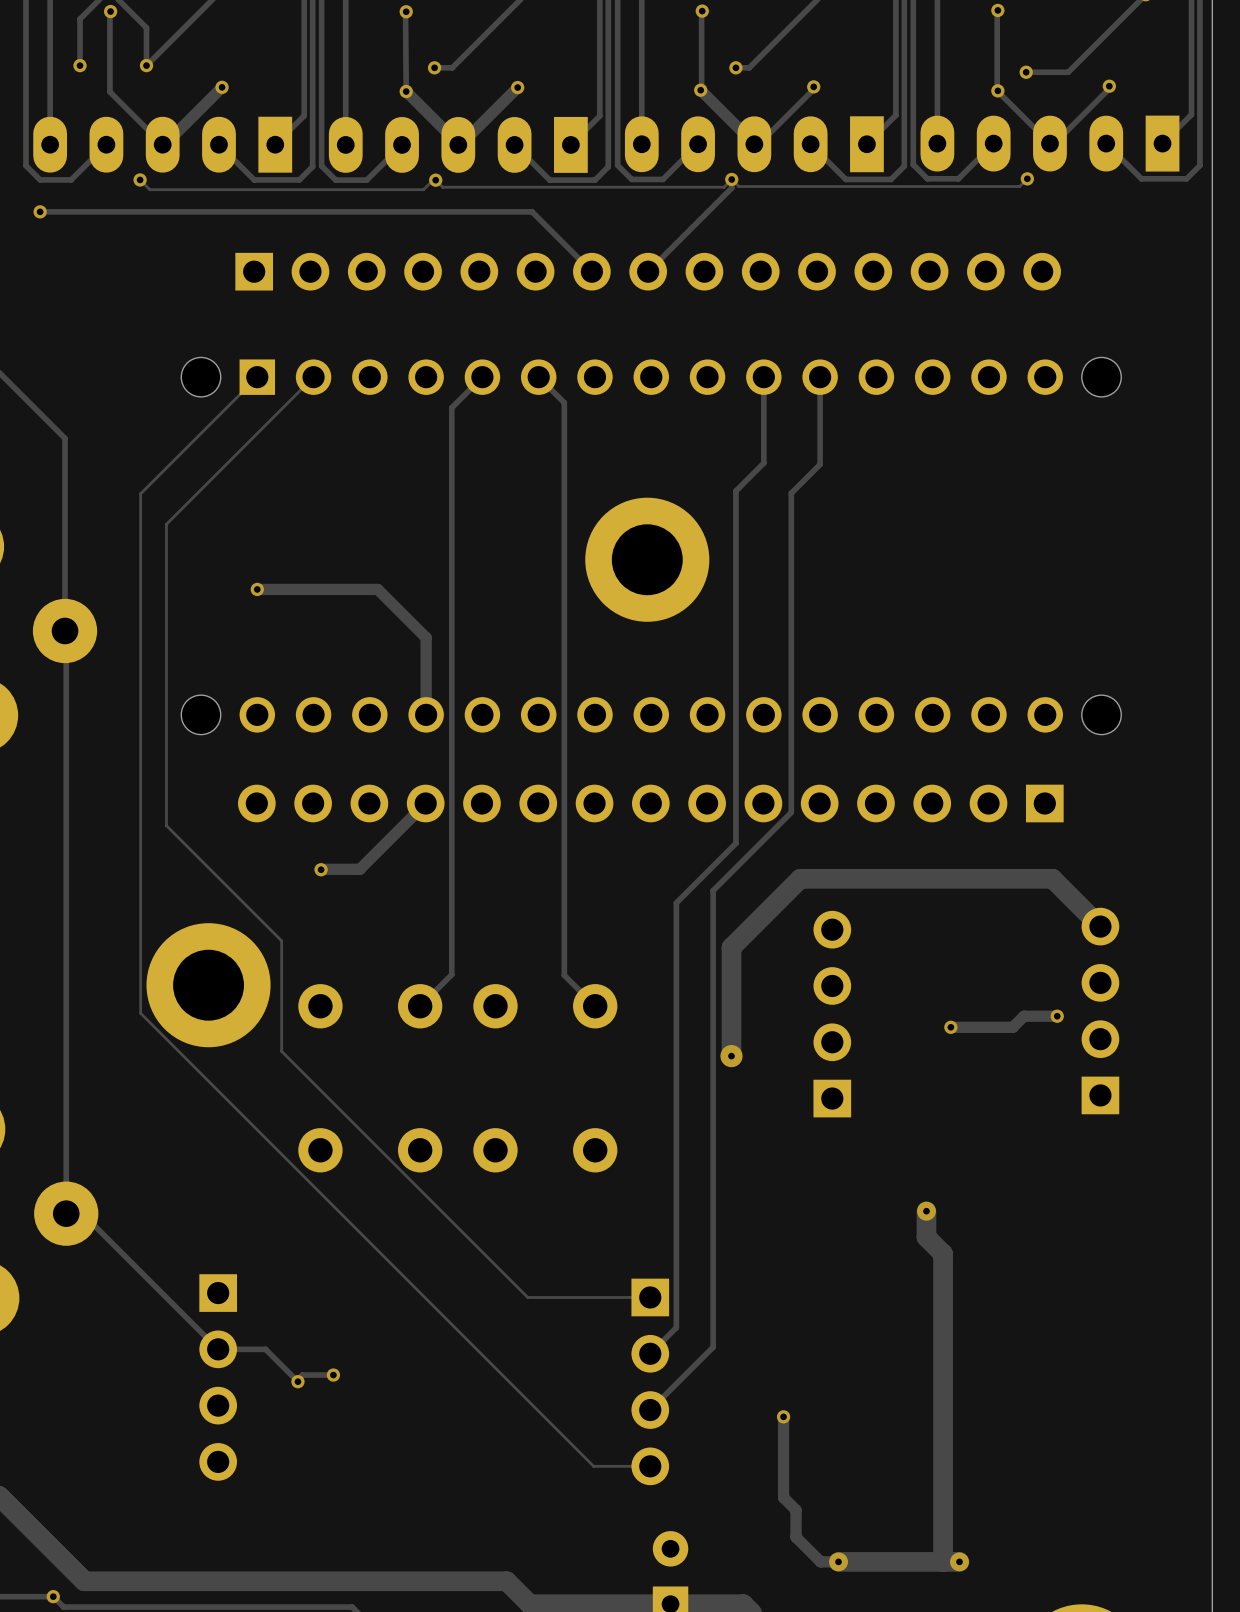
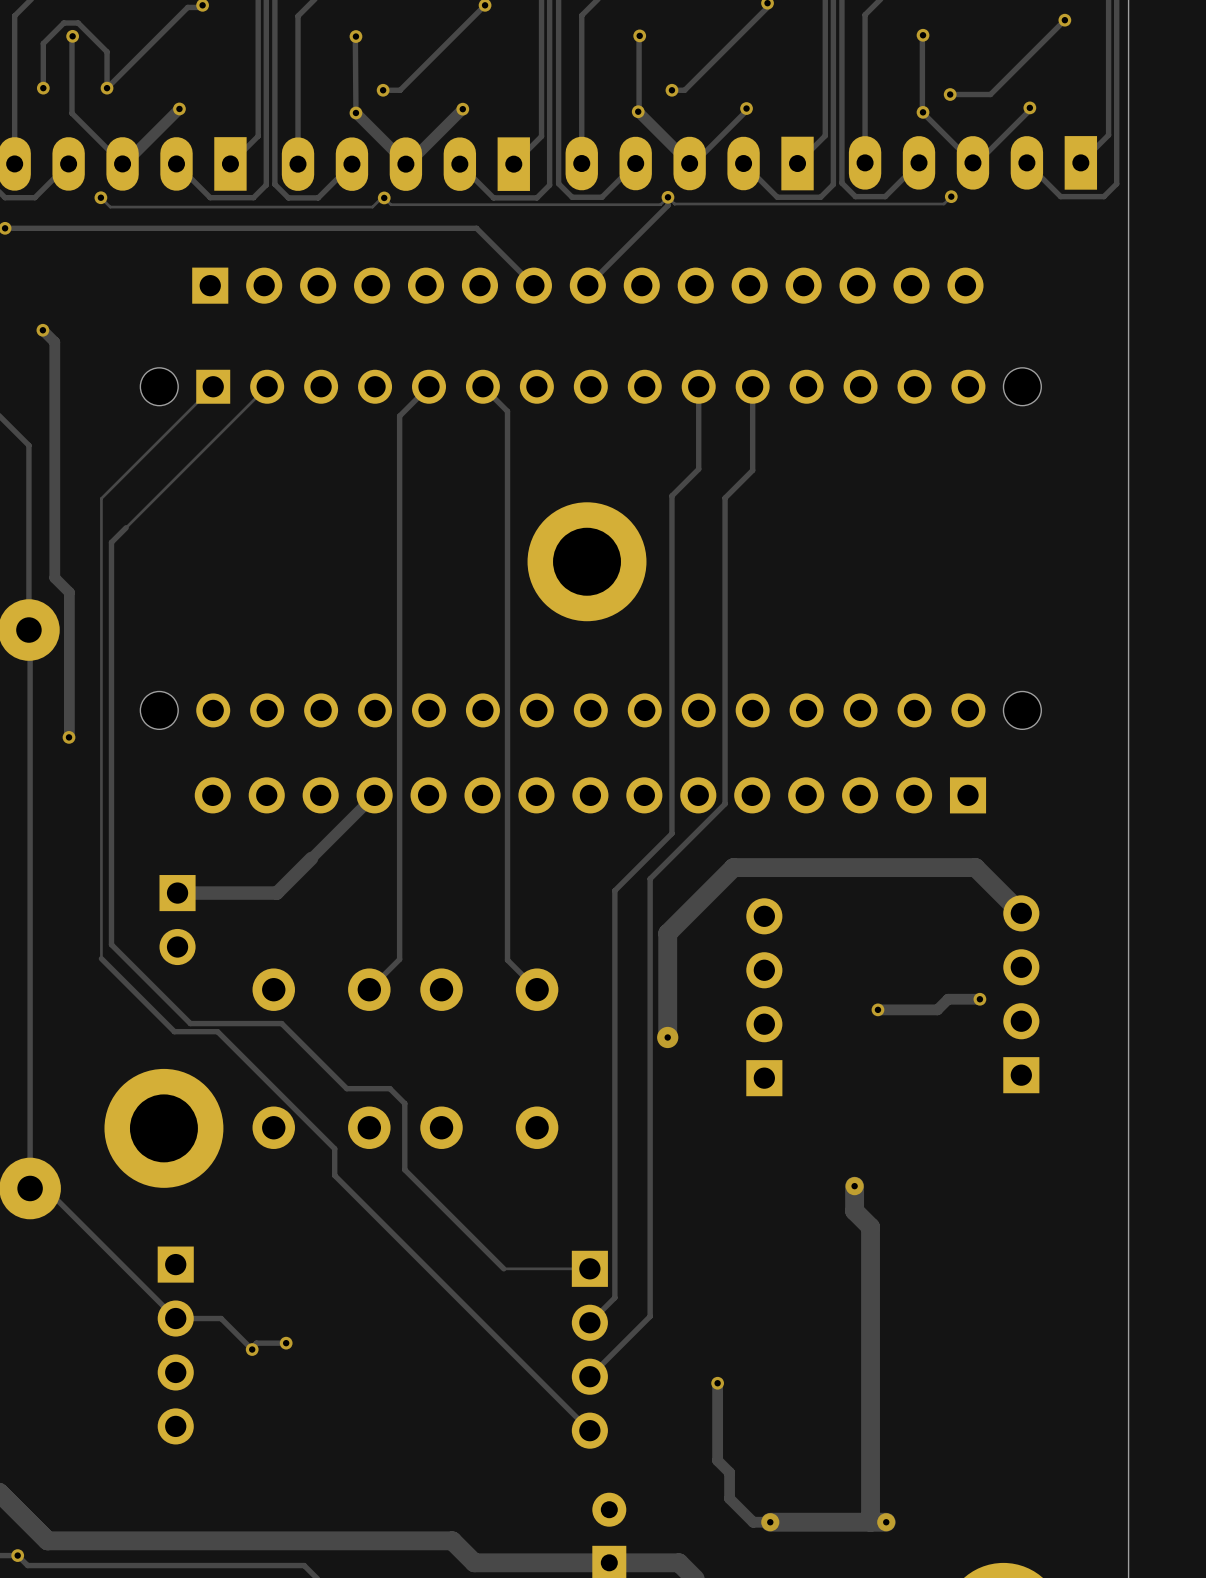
track: none -> (42, 330) (54, 342) (54, 577) (69, 592) (69, 737)
via: none -> (42, 330)
track: (166, 524) (166, 825) (281, 940) (281, 1051) (527, 1297) (560, 1297) -> (126, 527) (111, 542) (111, 944) (190, 1023) (281, 1023) (346, 1088) (389, 1088) (404, 1103) (404, 1169) (503, 1268)
track: (257, 589) (377, 589) (426, 637) (426, 714) -> none
via: (257, 589) -> none
via: none -> (69, 737)
via: (321, 869) -> none
track: (359, 869) (320, 869) -> (311, 858) (276, 893) (177, 893)
part: none -> (177, 920)
track: (140, 973) (140, 1013) (593, 1466) (650, 1466) -> (101, 958) (174, 1031) (217, 1031) (334, 1148) (334, 1175) (589, 1430)
part position: (208, 985) -> (163, 1128)

